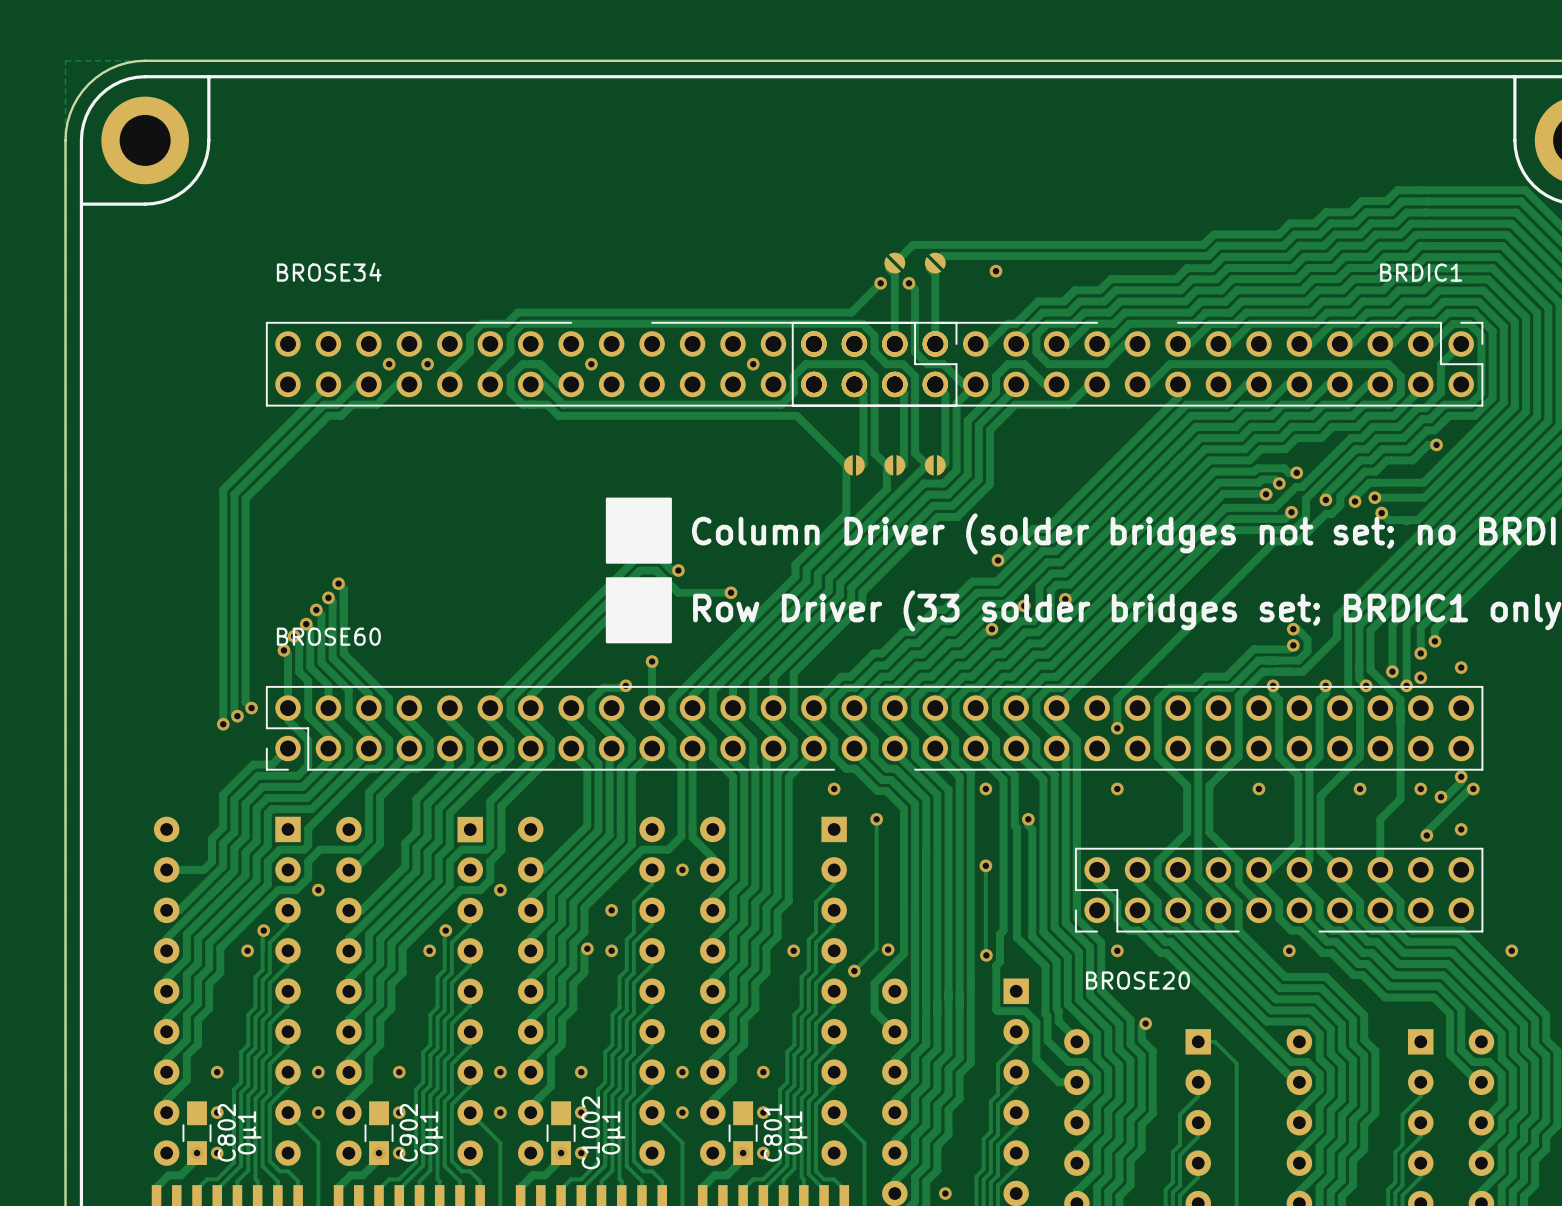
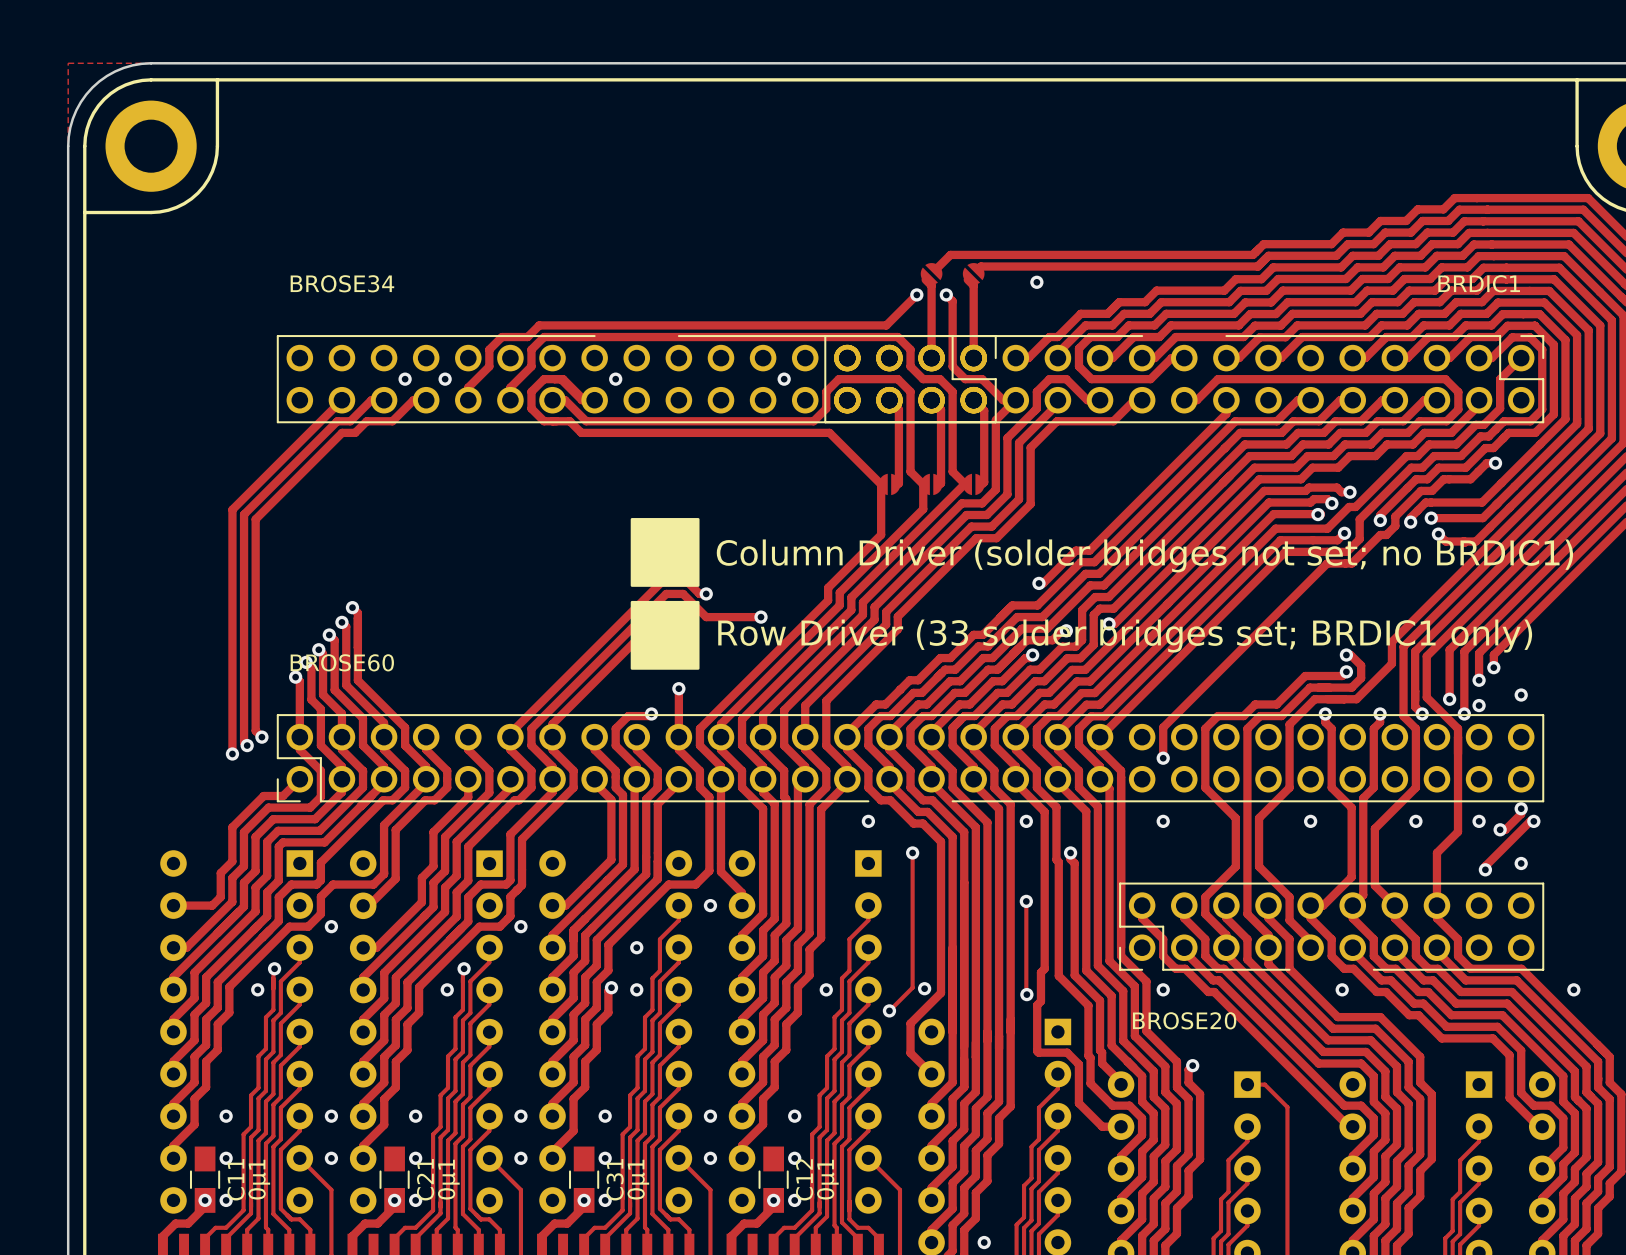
C802 name: C802 (226, 1132) -> C11 (236, 1179)
C902 name: C902 (408, 1132) -> C21 (425, 1179)
C1002 name: C1002 (590, 1132) -> C31 (615, 1179)
C801 name: C801 (772, 1132) -> C12 (804, 1179)

